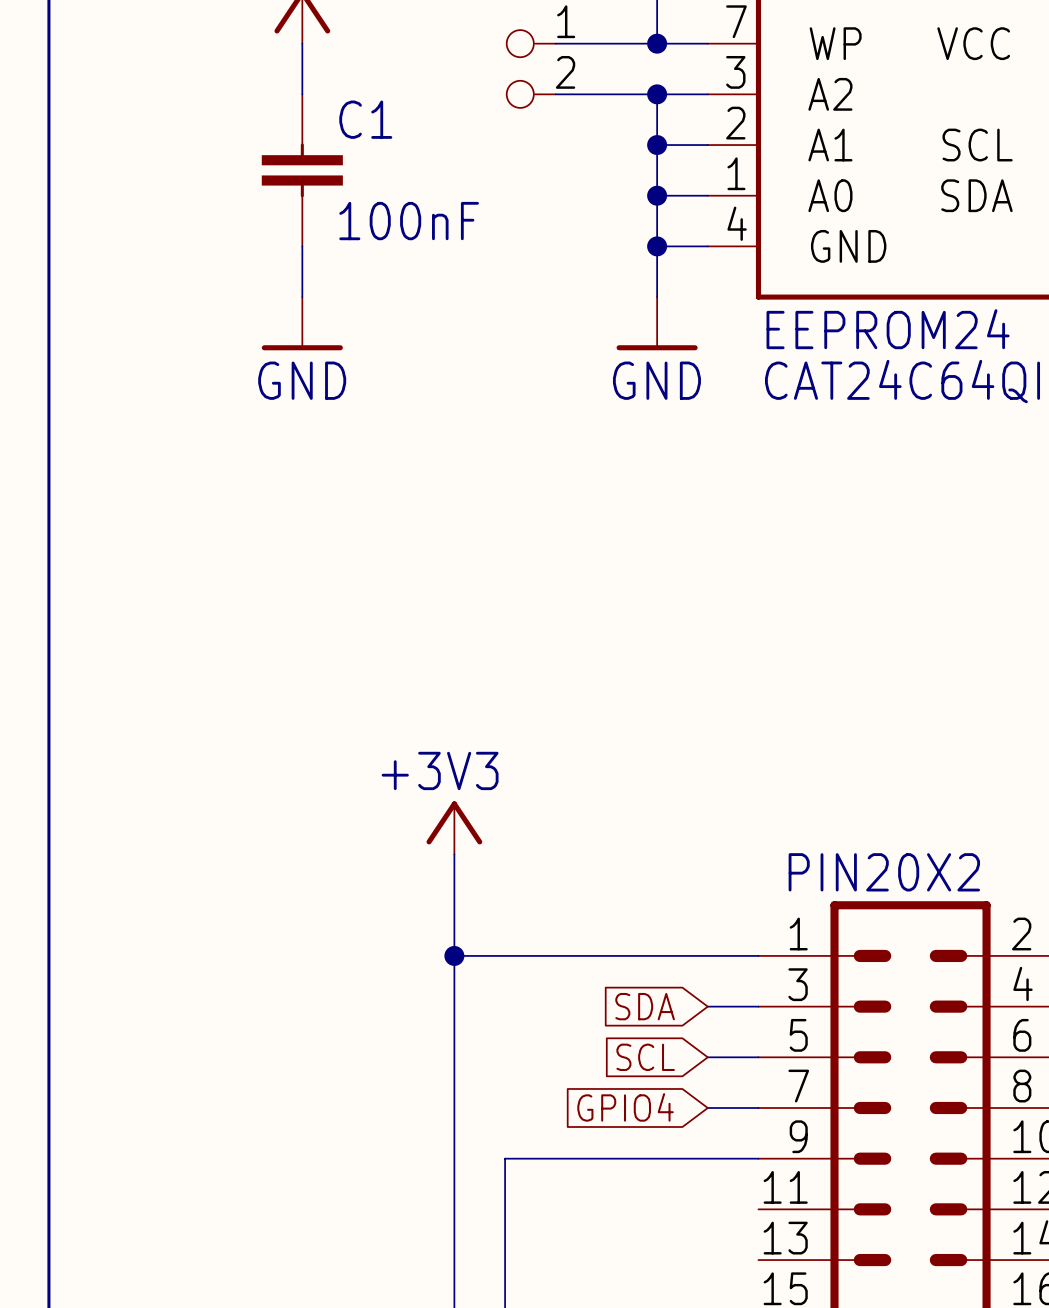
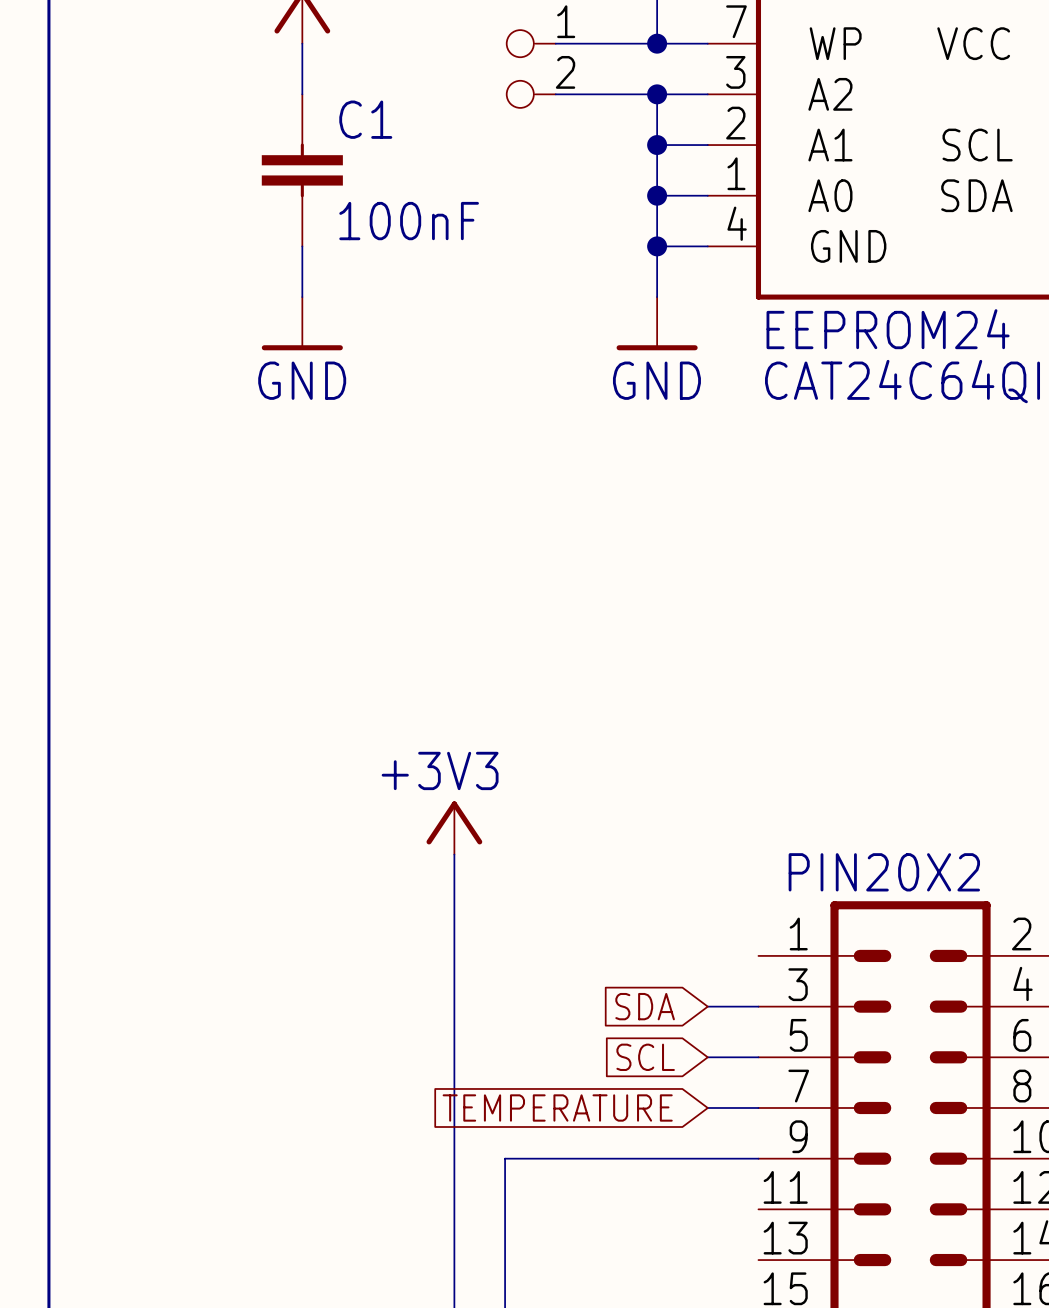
wire: (454, 955) (758, 955) -> none
junction: (454, 955) -> none
global label: GPIO4 (625, 1107) -> TEMPERATURE (557, 1107)

